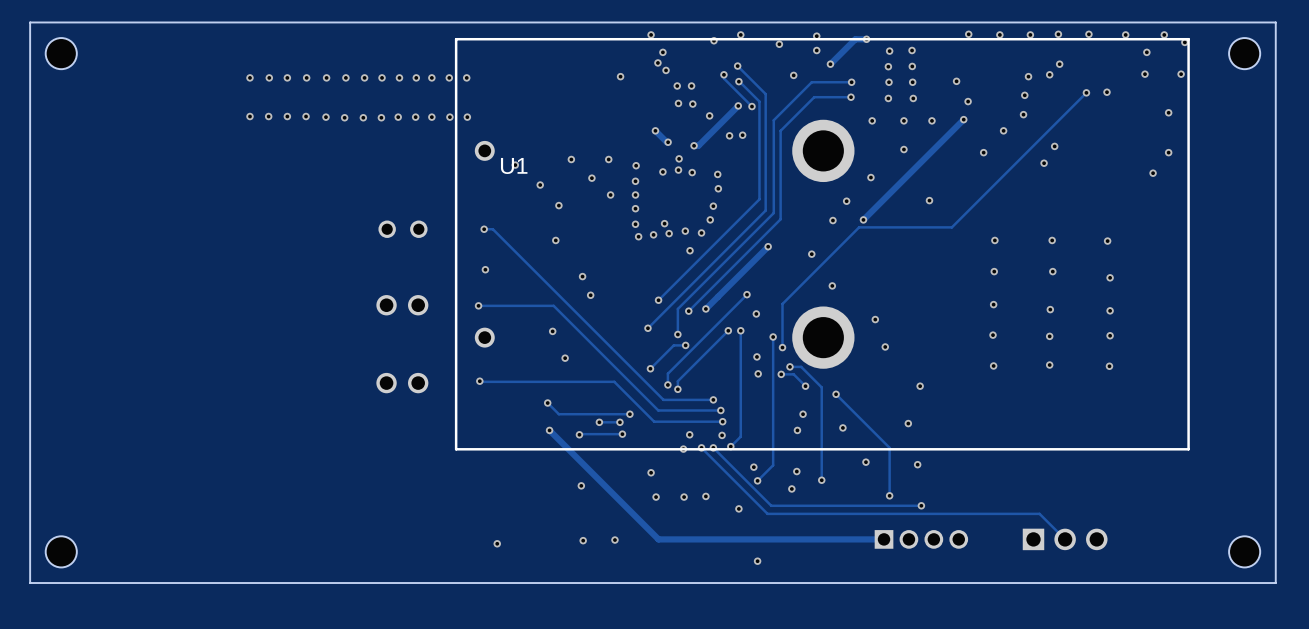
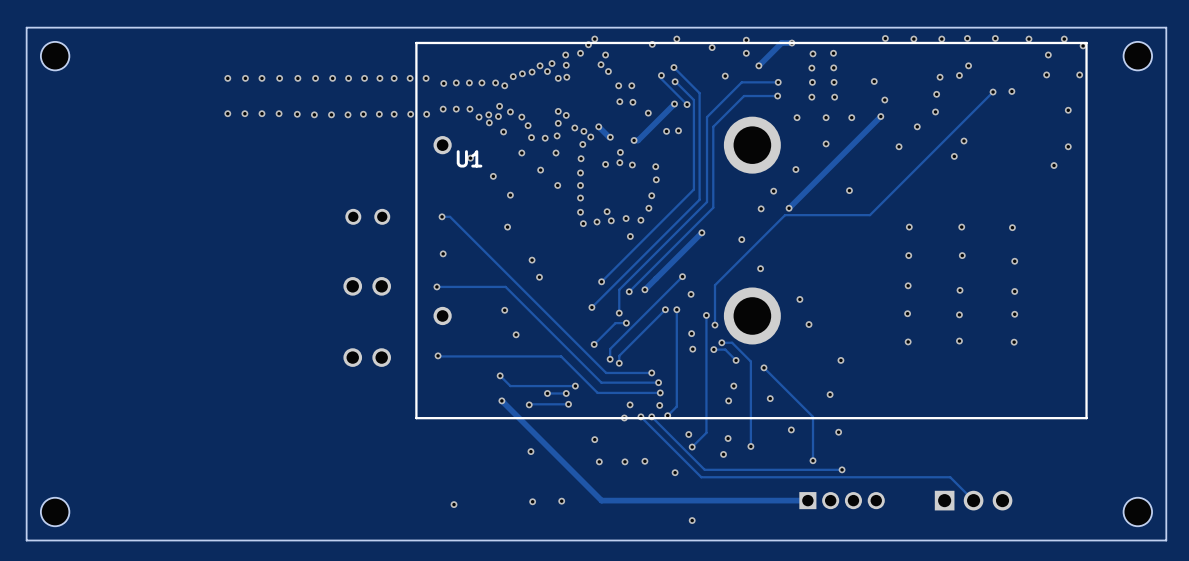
via: none -> (588, 44)
via: none -> (580, 53)
via: none -> (565, 55)
via: none -> (552, 63)
via: none -> (566, 65)
via: none -> (540, 65)
via: none -> (547, 71)
via: none -> (532, 72)
via: none -> (522, 73)
via: none -> (513, 76)
via: none -> (558, 78)
via: none -> (456, 82)
via: none -> (469, 82)
via: none -> (481, 82)
via: none -> (495, 82)
via: none -> (443, 83)
via: none -> (504, 85)
via: none -> (499, 106)
via: none -> (443, 109)
via: none -> (456, 109)
via: none -> (469, 109)
via: none -> (510, 111)
via: none -> (558, 111)
via: none -> (488, 114)
via: none -> (566, 115)
via: none -> (498, 116)
via: none -> (479, 117)
via: none -> (521, 117)
via: none -> (489, 122)
via: none -> (558, 123)
via: none -> (528, 125)
via: none -> (574, 127)
via: none -> (583, 131)
via: none -> (503, 131)
via: none -> (557, 135)
via: none -> (531, 137)
via: none -> (590, 137)
via: none -> (545, 138)
via: none -> (582, 144)

